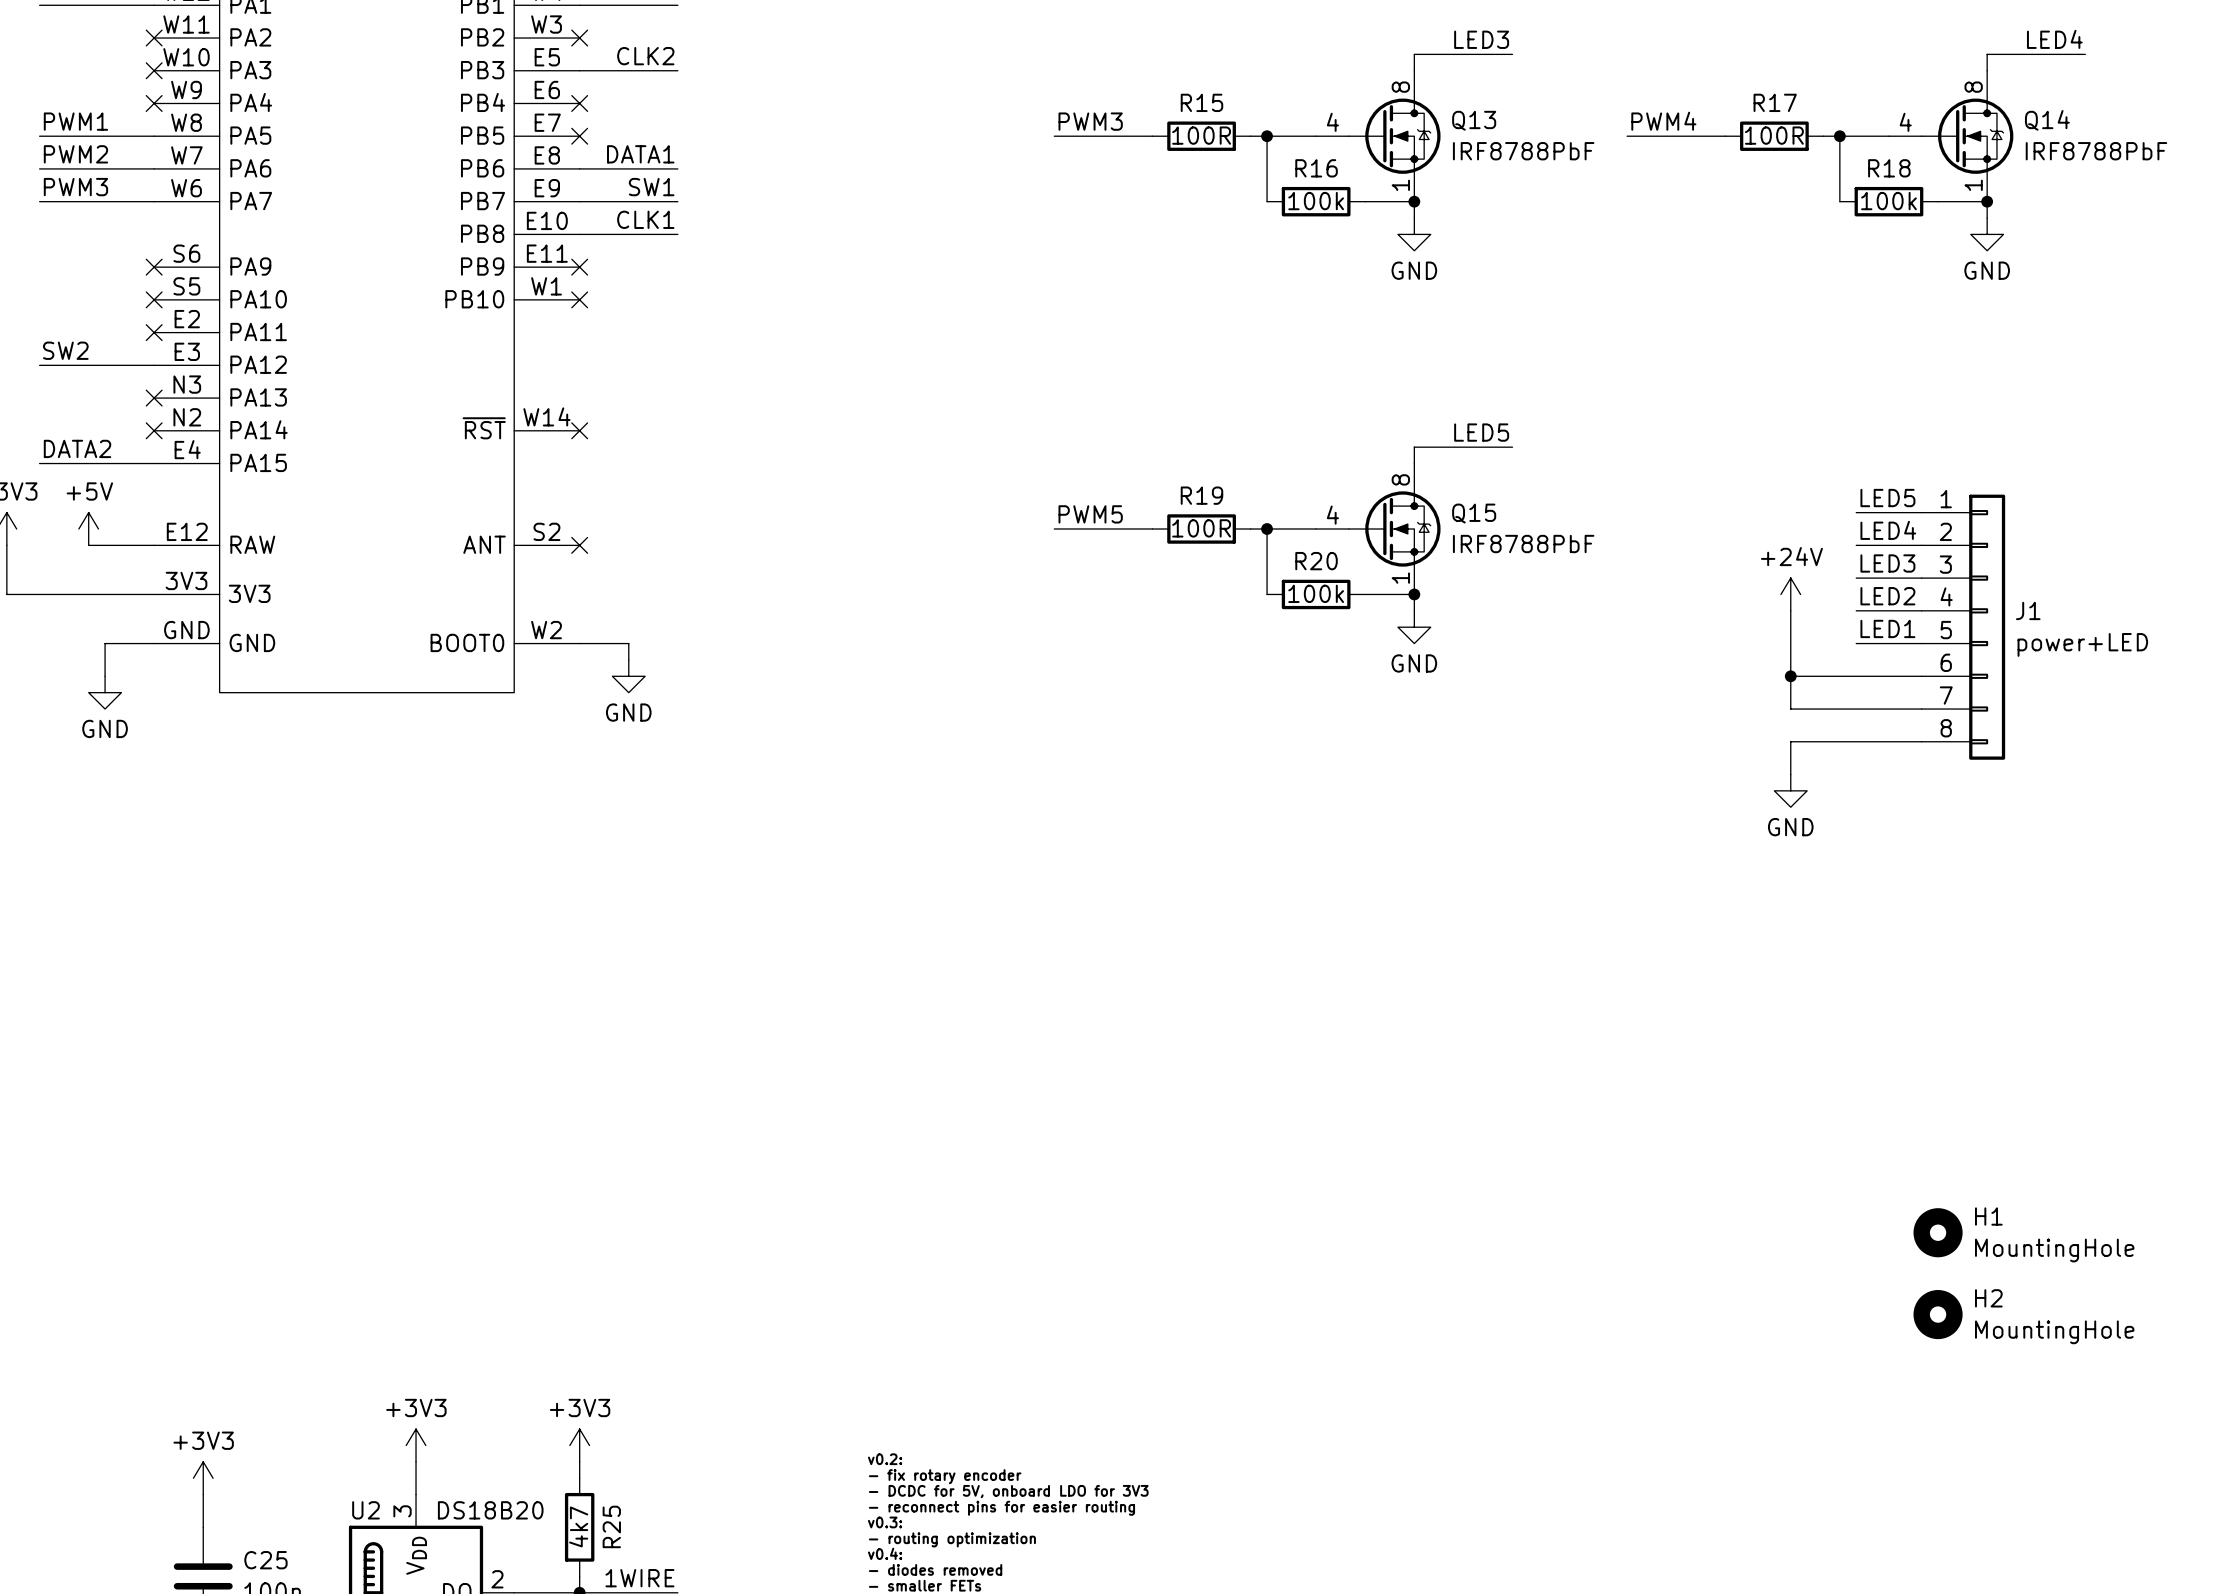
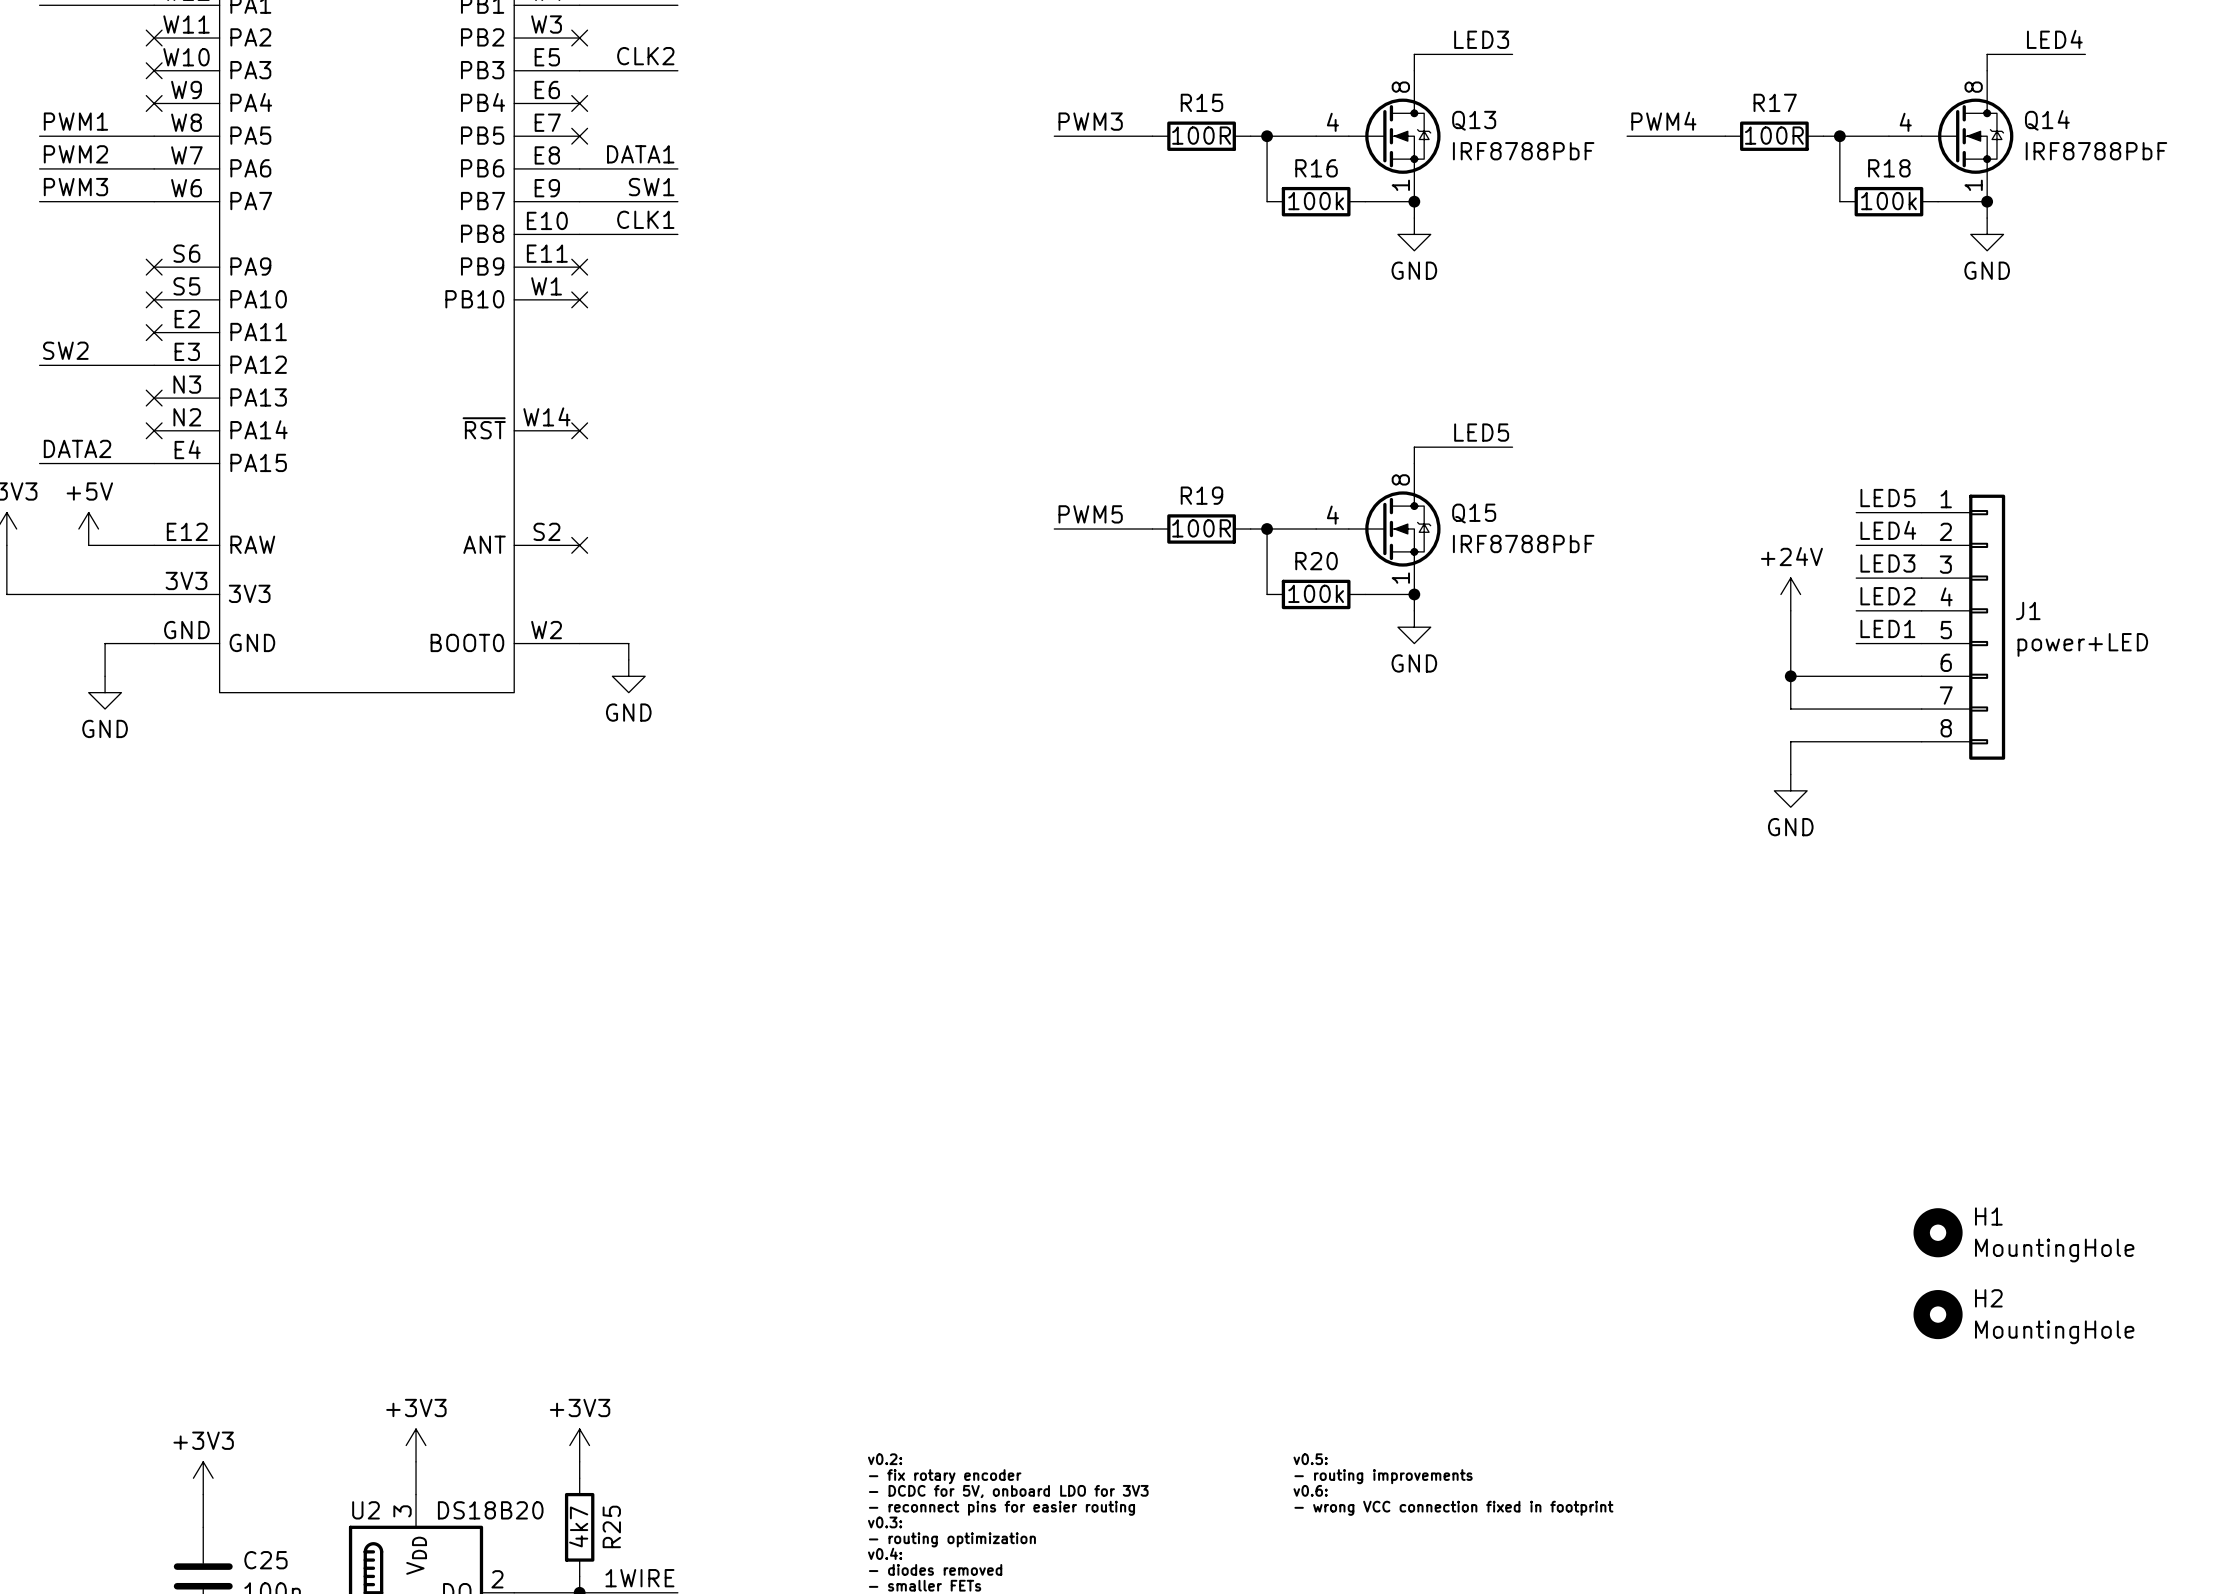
text: none -> v0.5: (1310, 1459)
text: none -> - routing improvements (1383, 1476)
text: none -> v0.6: (1310, 1490)
text: none -> - wrong VCC connection fixed in footprint (1453, 1508)

